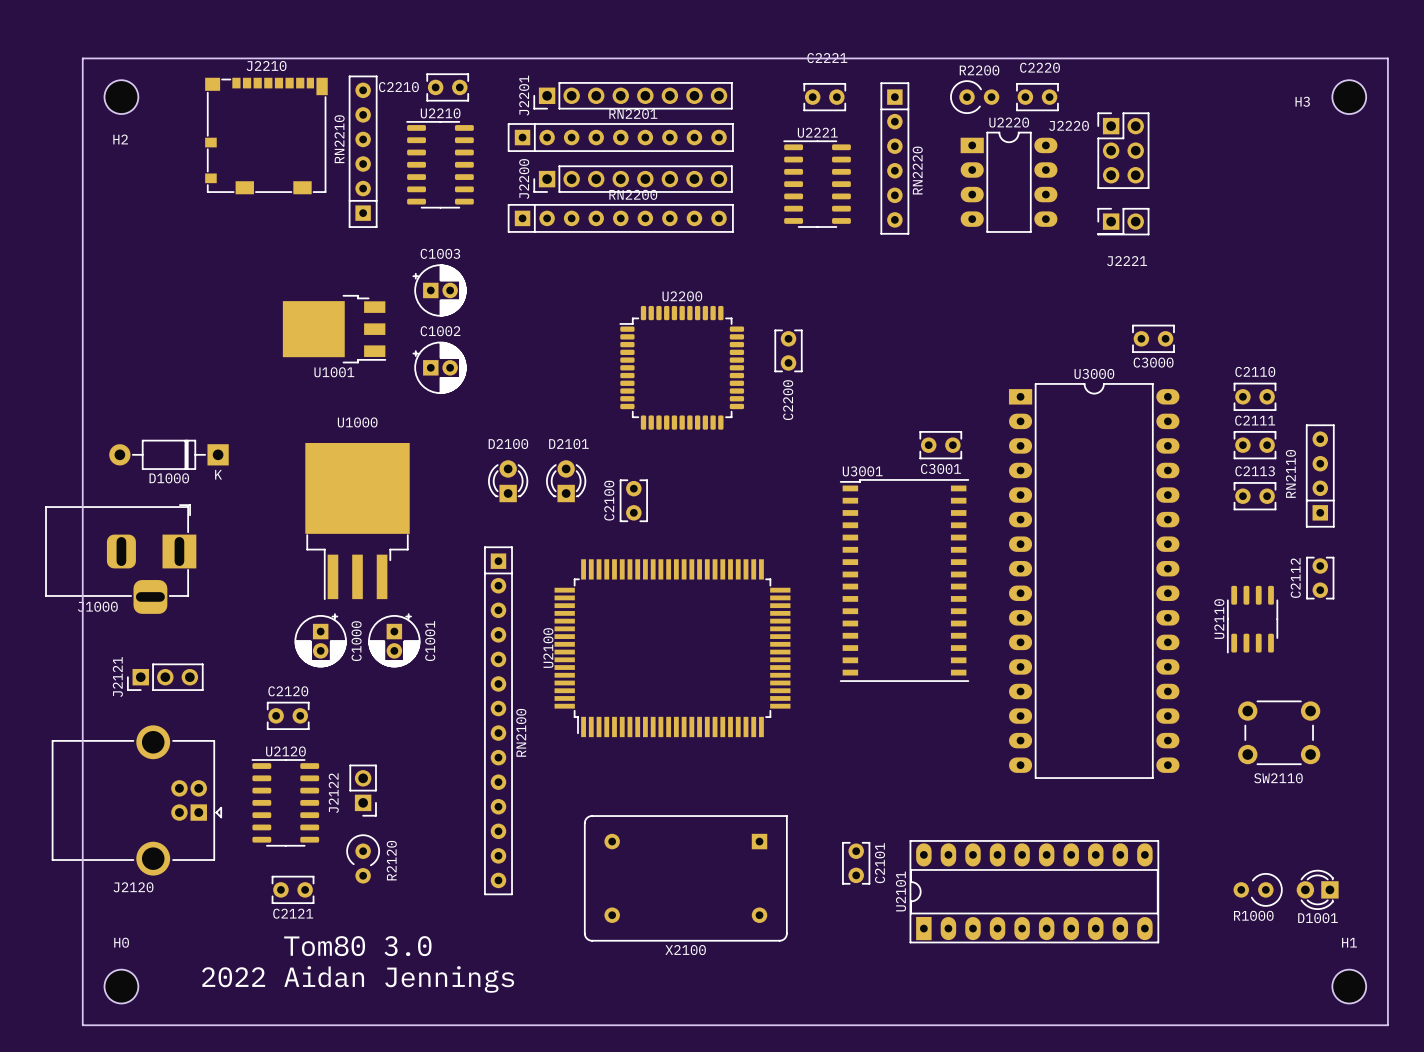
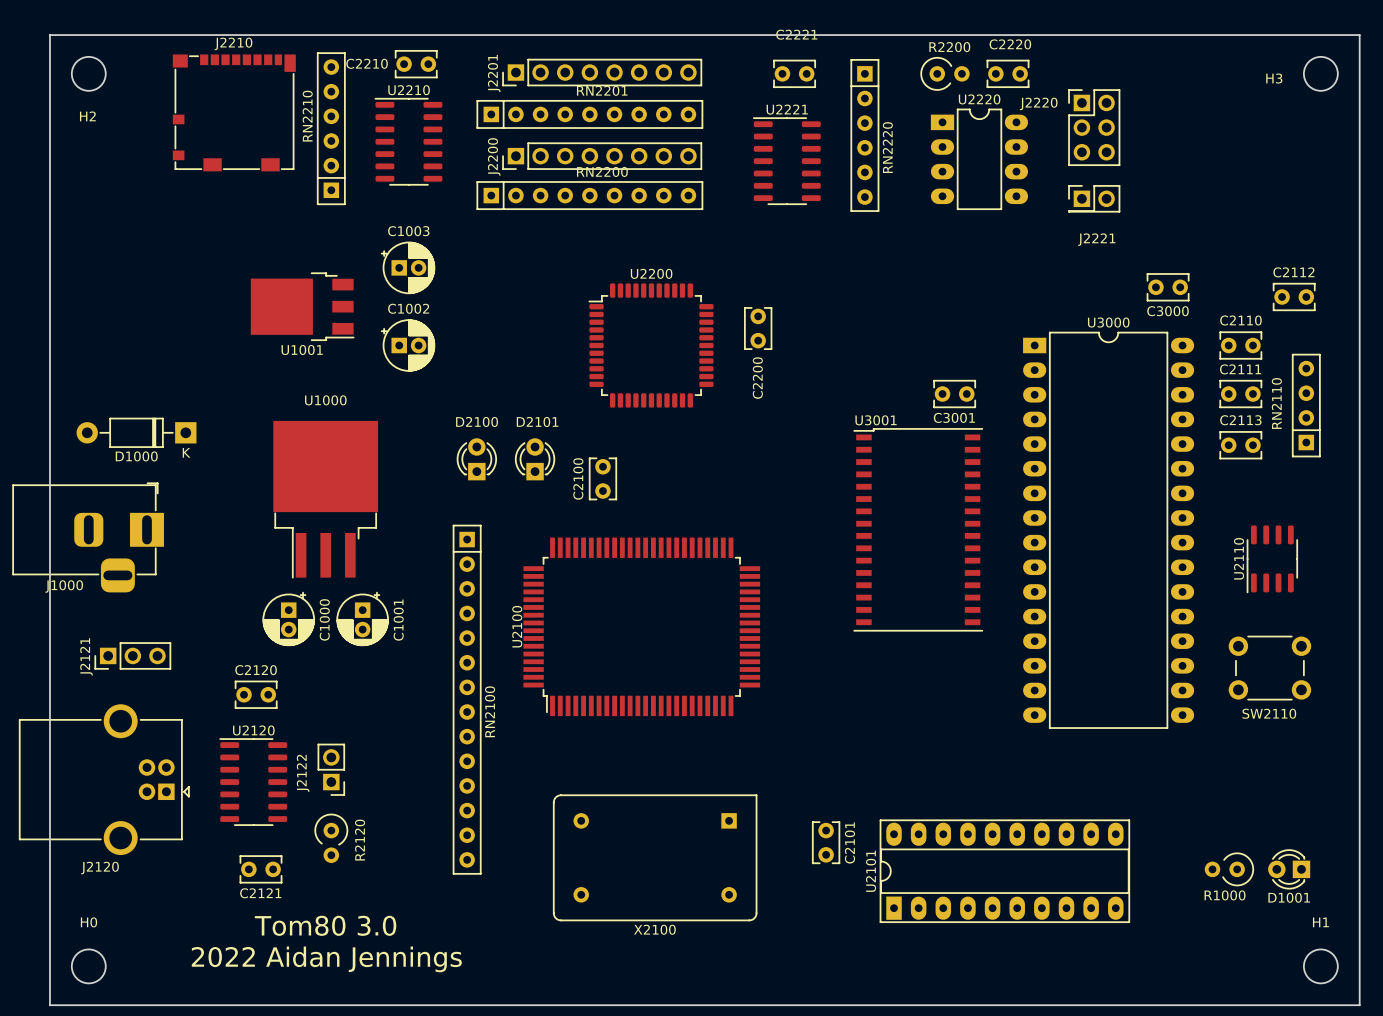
C3000 position: (1153, 338) -> (1168, 287)
C2110 position: (1255, 396) -> (1240, 345)
C3001 position: (940, 445) -> (954, 394)
C2111 position: (1255, 445) -> (1240, 394)
RN2110 position: (1320, 476) -> (1306, 405)
C2113 position: (1255, 496) -> (1240, 445)
C2112 rotation: 0° (1320, 578) -> 90° clockwise (1294, 296)
C2112 position: (1320, 578) -> (1294, 296)
U3001 position: (904, 580) -> (918, 529)
U3000 position: (1094, 580) -> (1108, 530)
U2110 position: (1252, 619) -> (1272, 559)
SW2110 position: (1279, 732) -> (1269, 668)

